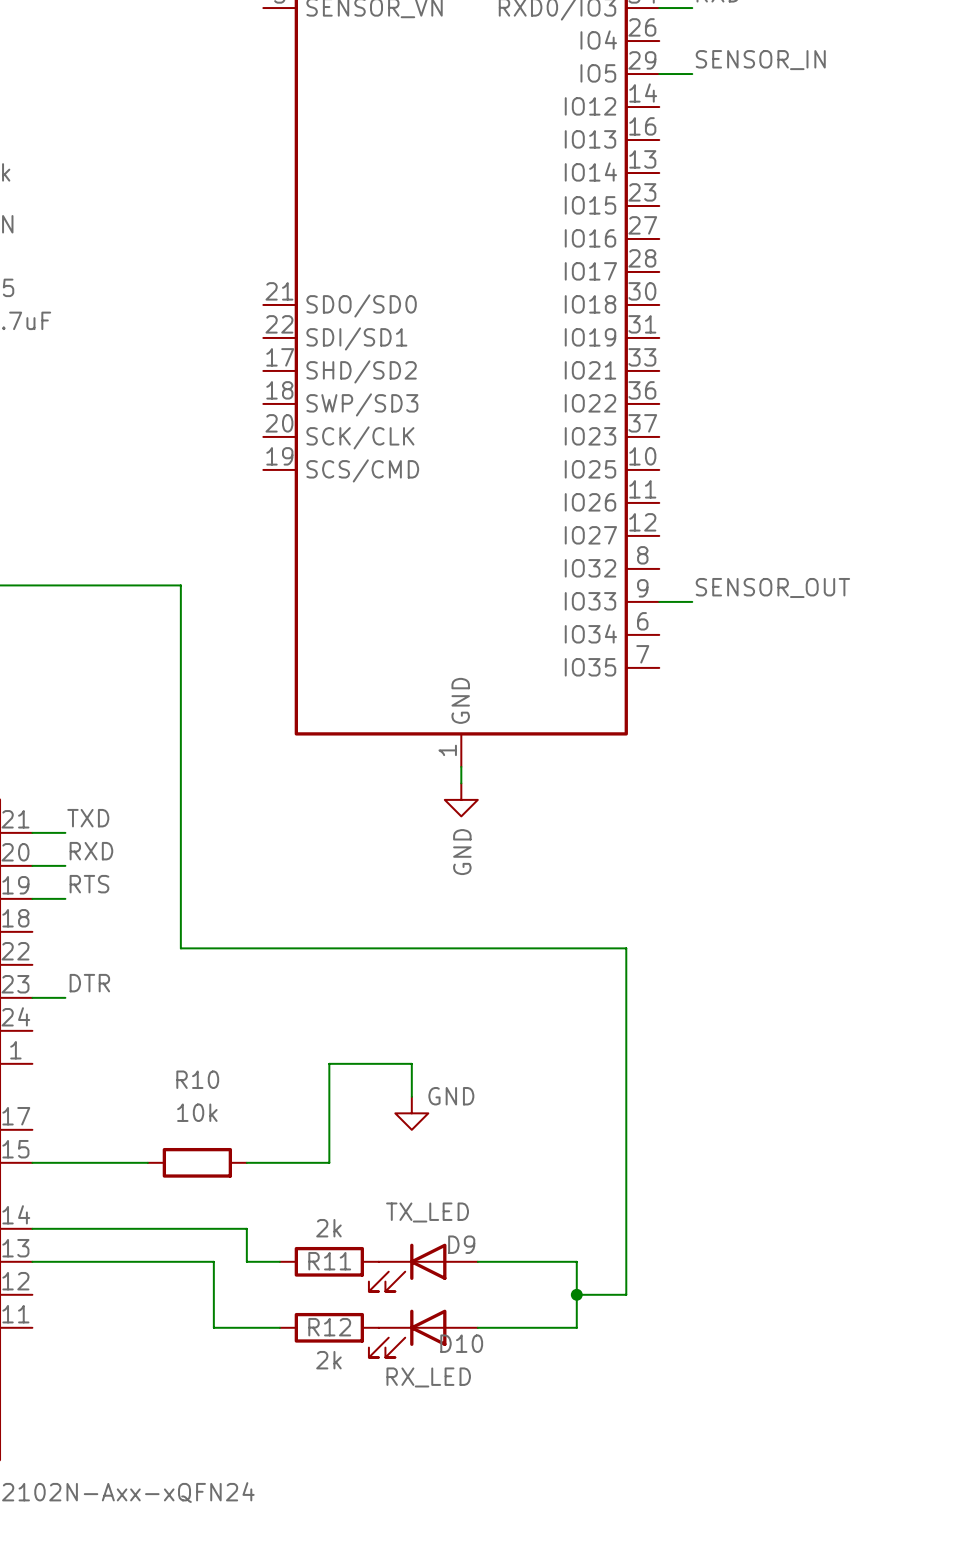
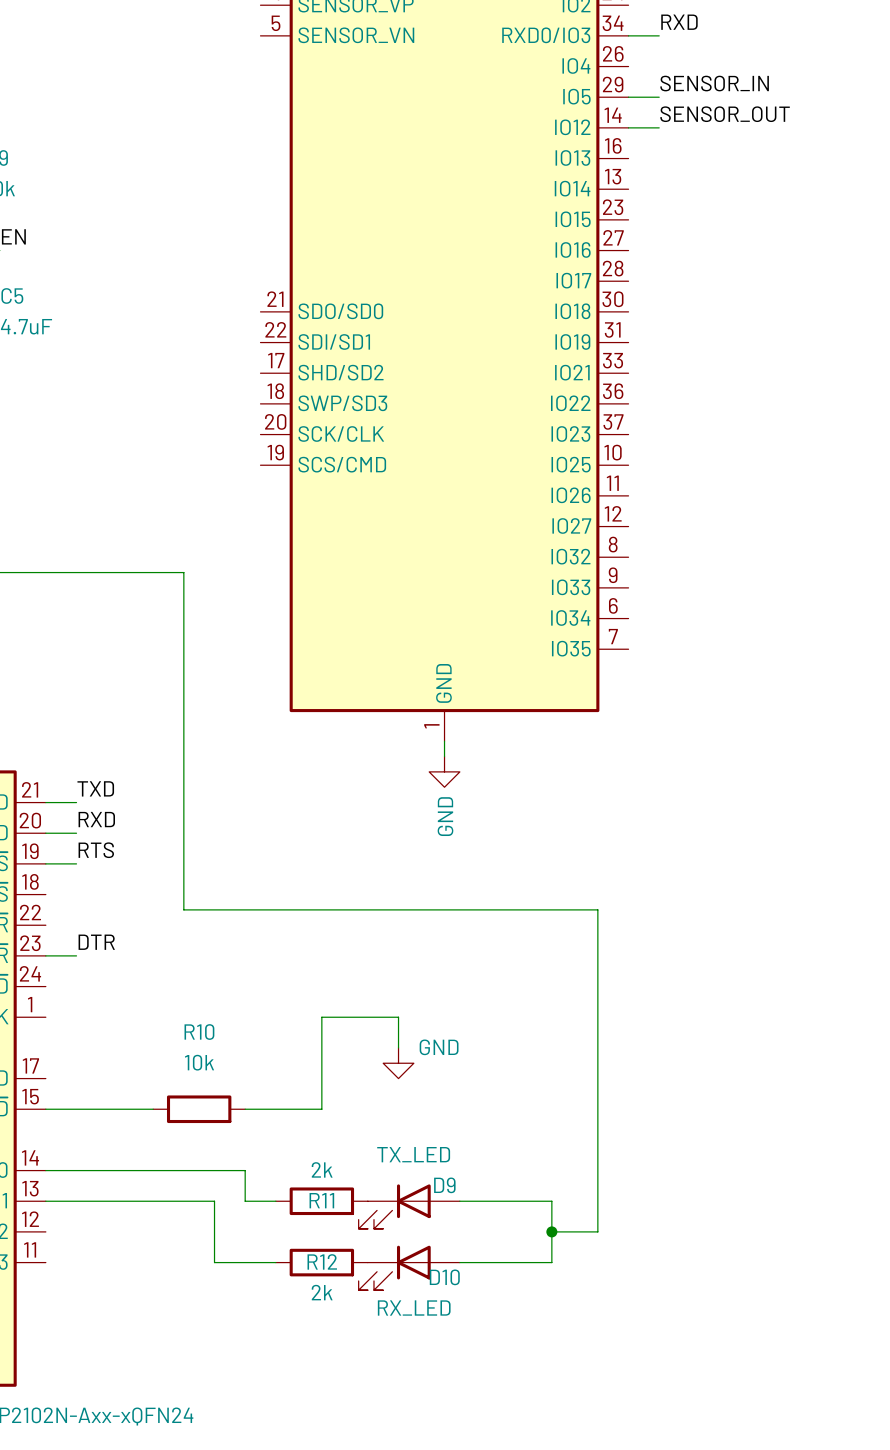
label: none -> SENSOR_OUT (725, 114)
wire: none -> (628, 127) (659, 127)
label: SENSOR_OUT (772, 587) -> none
wire: (659, 601) (692, 601) -> none

